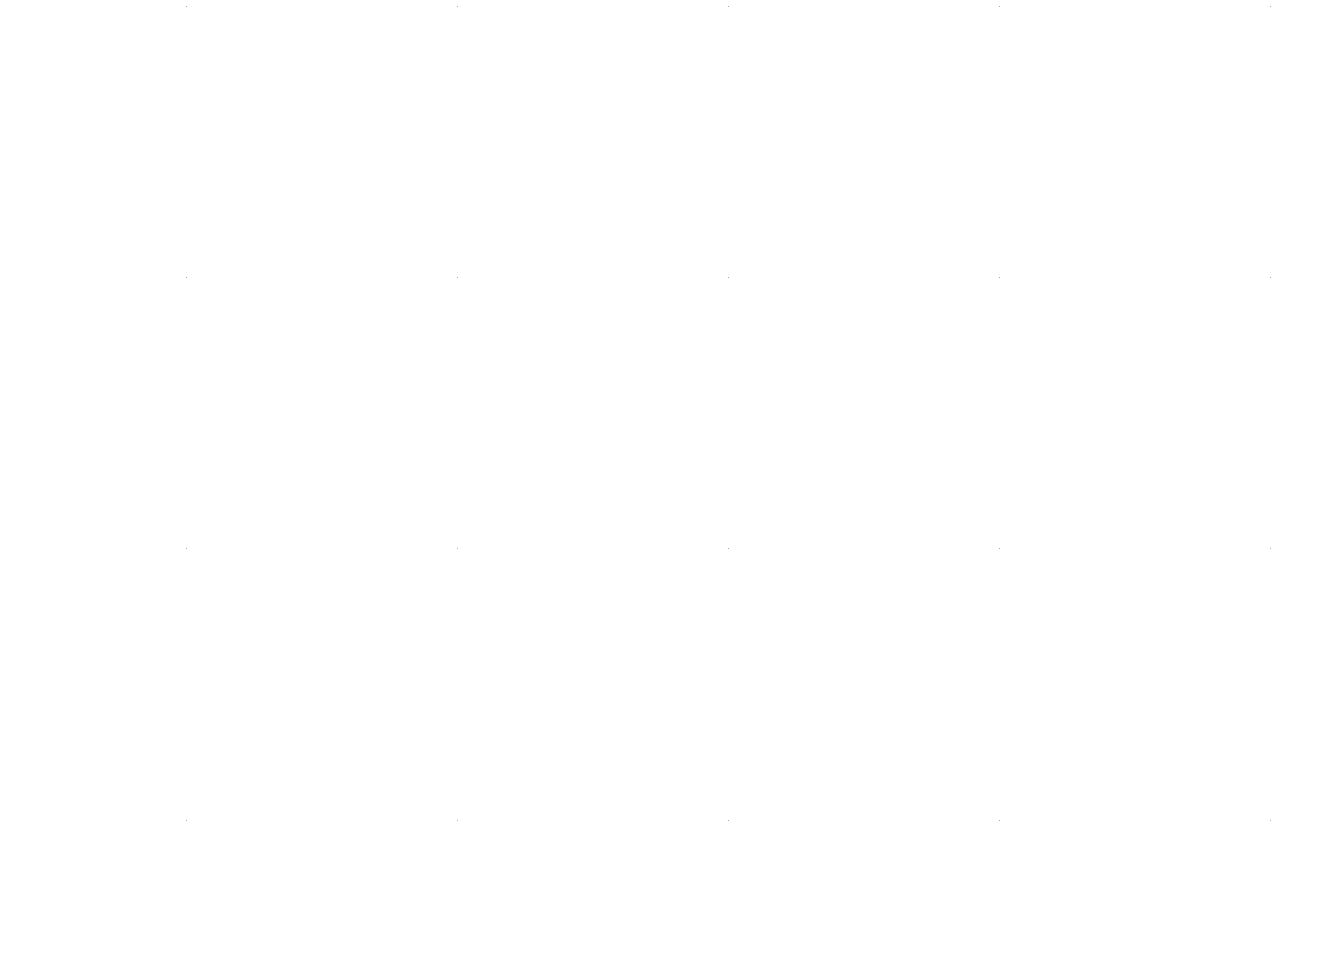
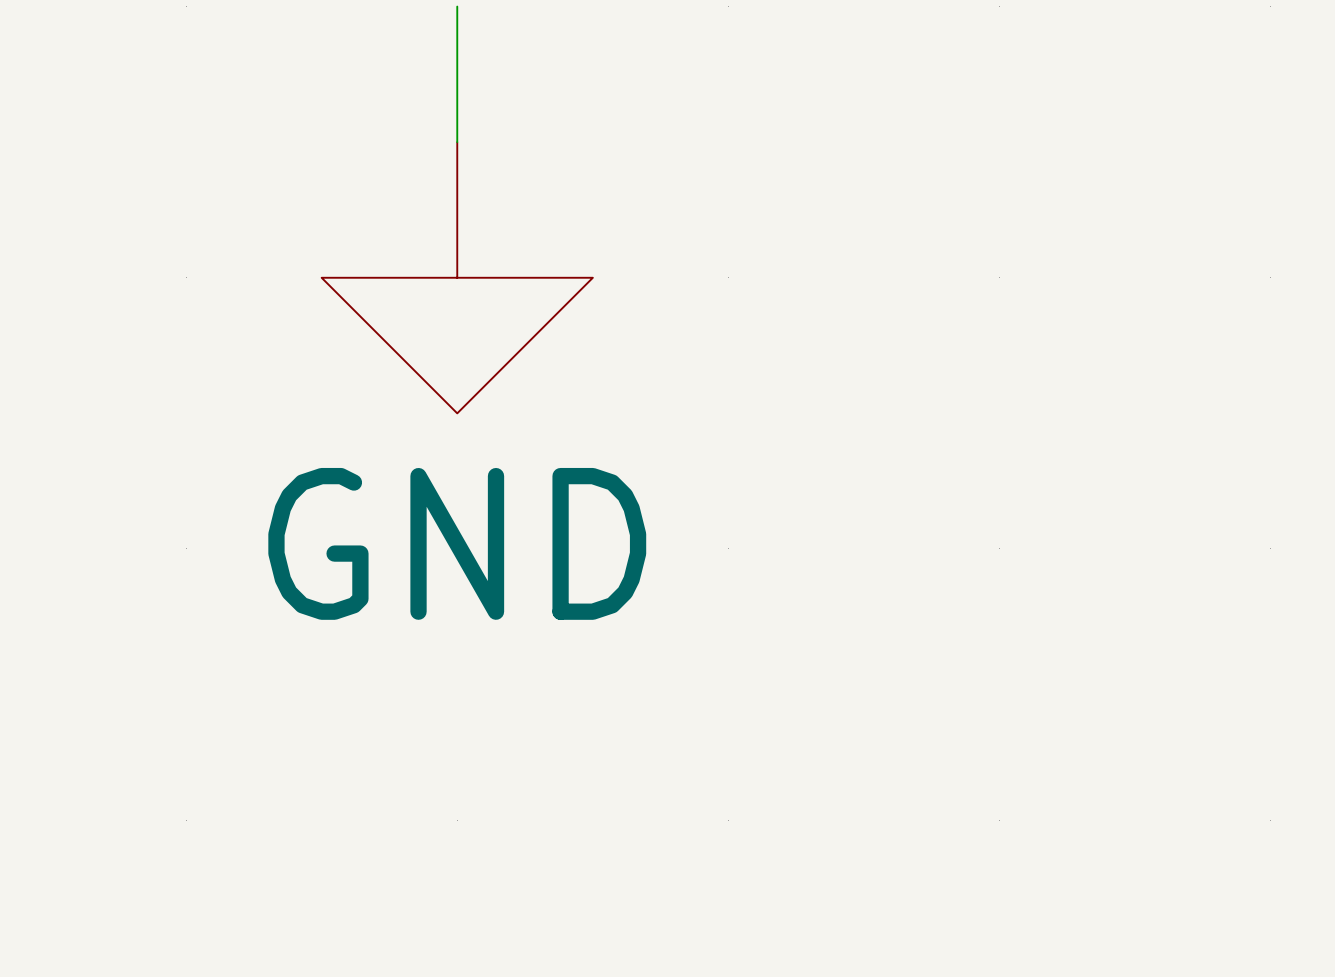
wire: none -> (457, 6) (457, 142)
power symbol: none -> GND (457, 277)

